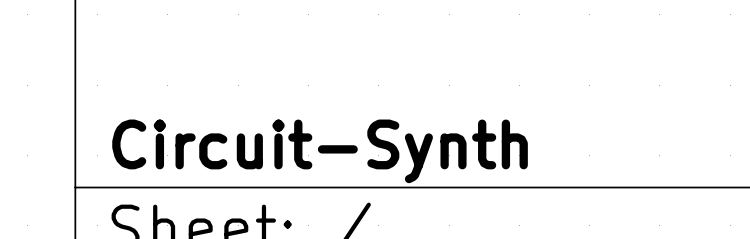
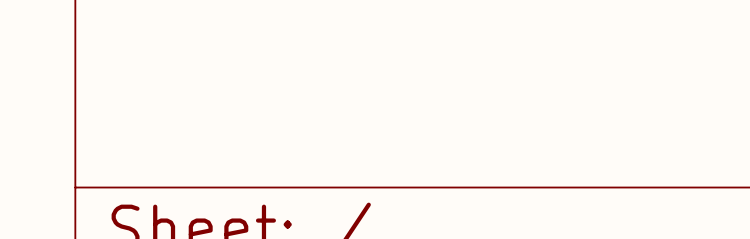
title block: Circuit-Synth (320, 151) -> none

